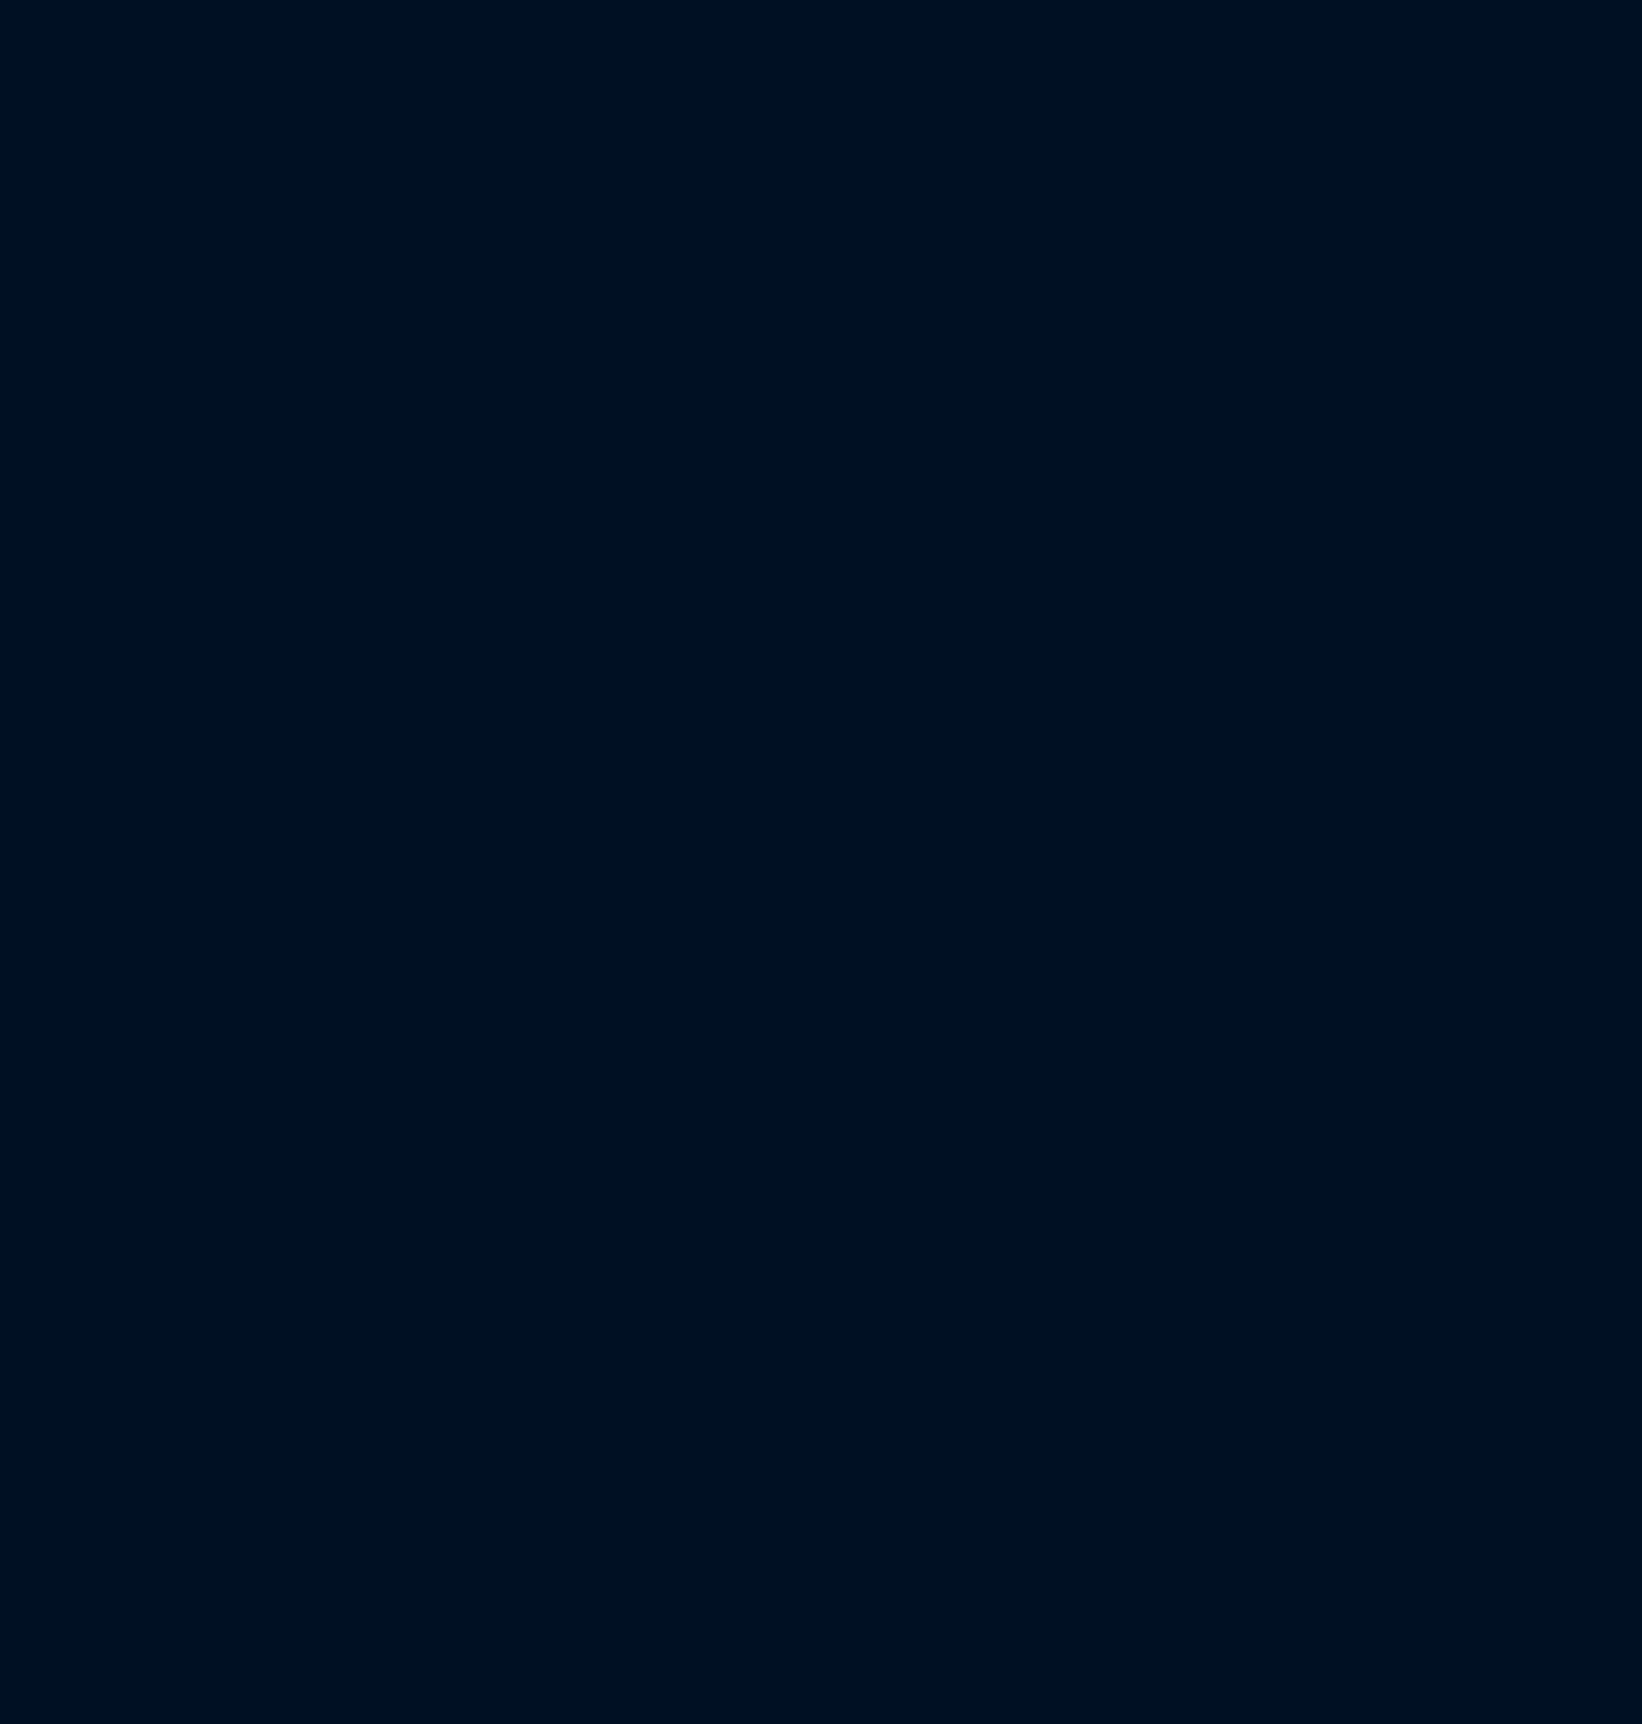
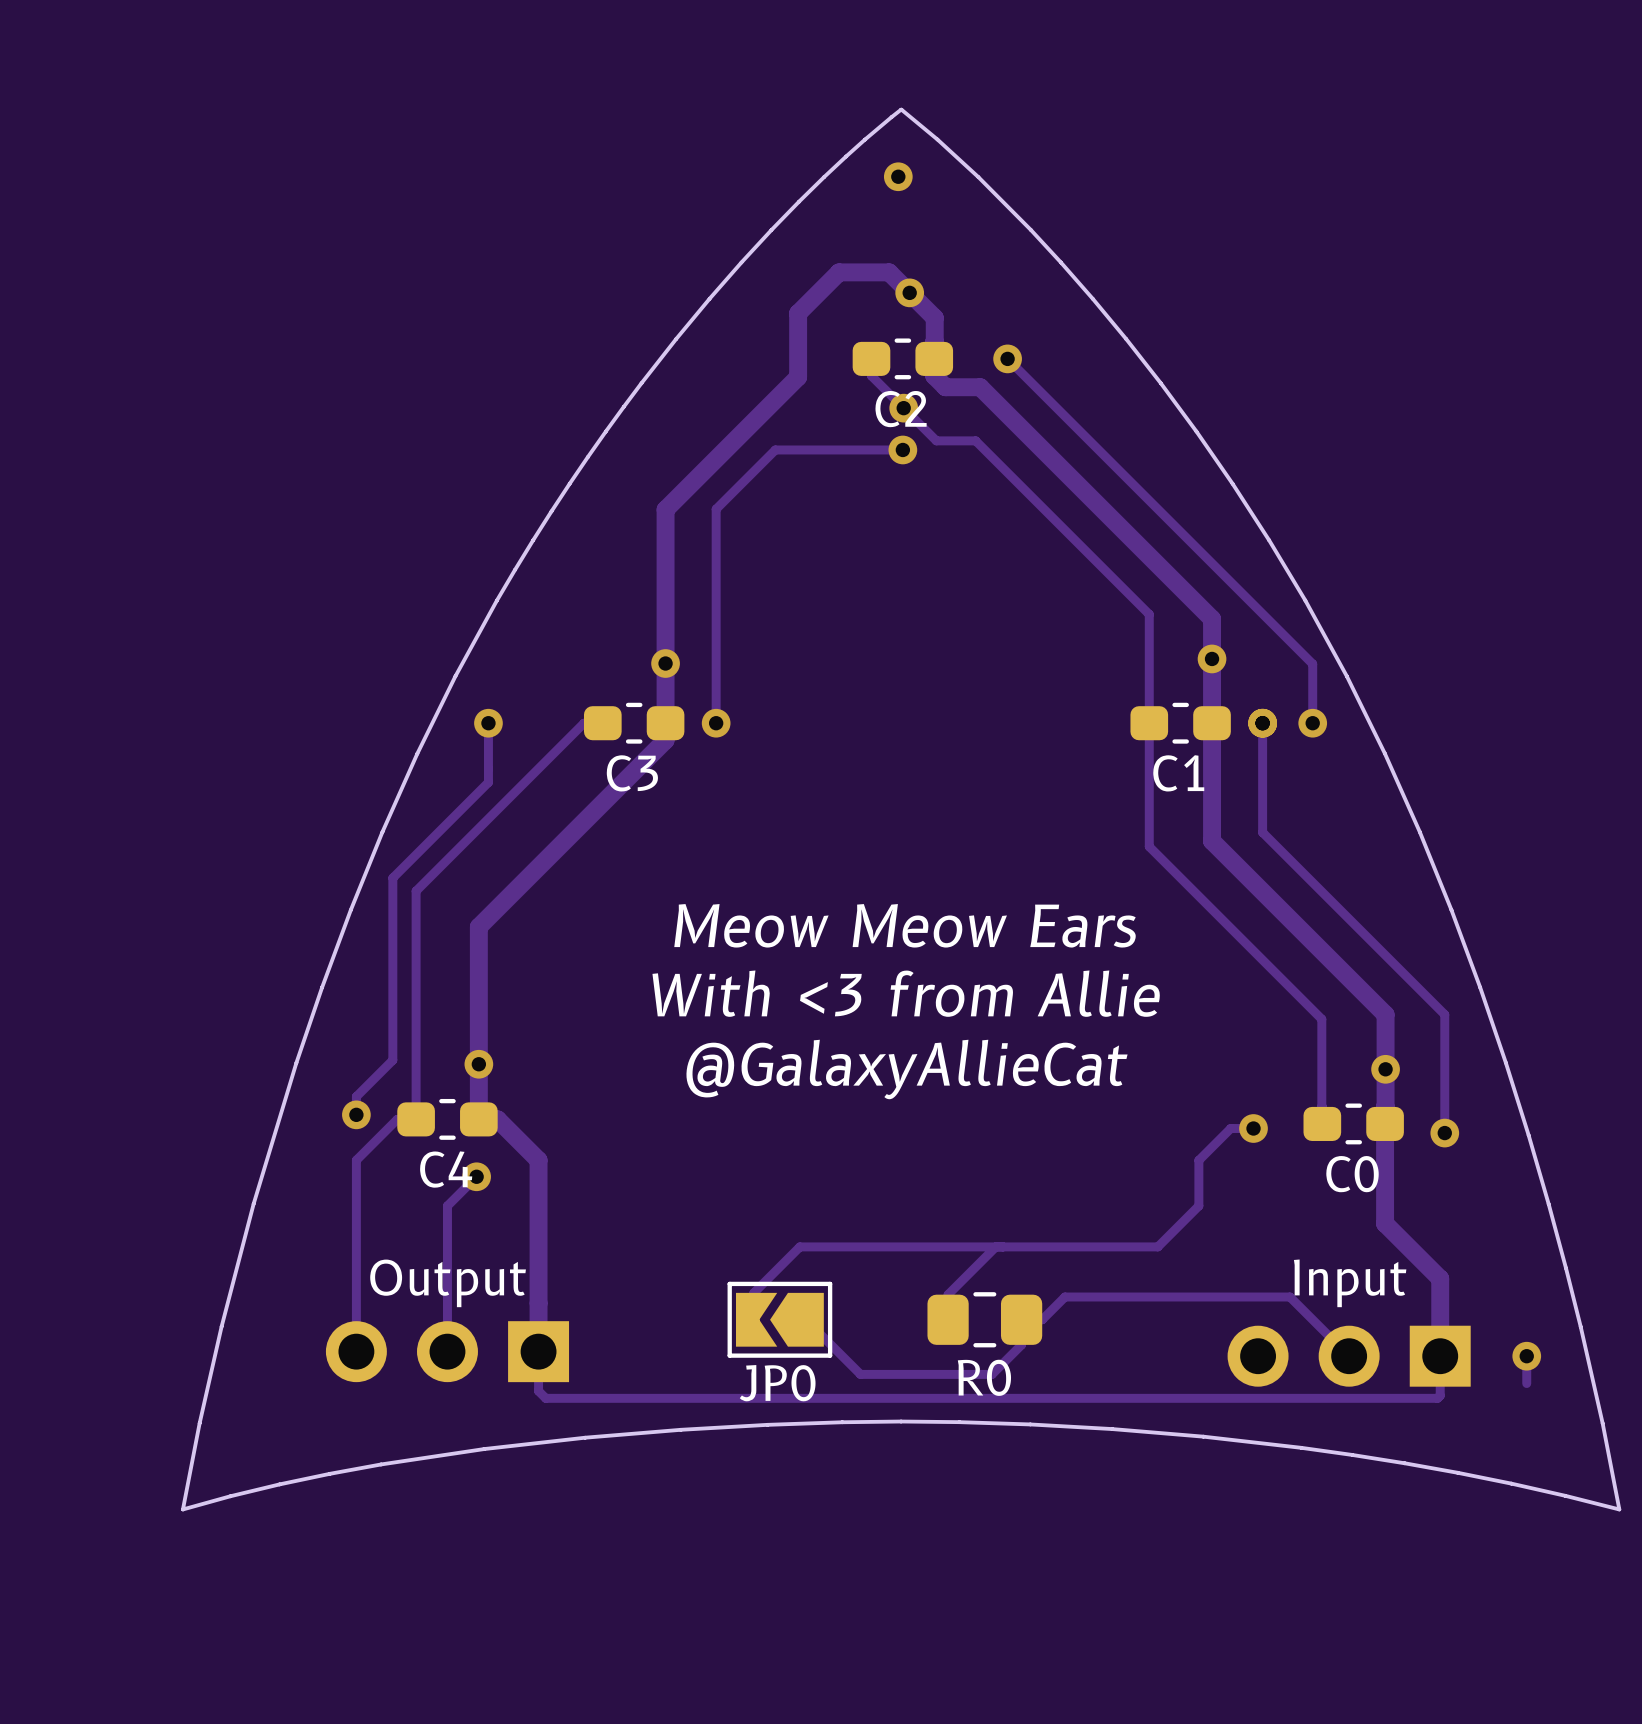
board edge: none -> (901, 109) (978, 177) (1031, 230) (1126, 339) (1196, 431) (1232, 483) (1305, 600) (1346, 676) (1384, 753) (1419, 831) (1451, 910) (1505, 1062) (1528, 1135) (1565, 1268) (1602, 1423) (1619, 1509) (1457, 1472) (1301, 1447) (1112, 1429) (1030, 1424) (901, 1421) (767, 1424) (680, 1429) (484, 1449) (329, 1473) (230, 1496) (182, 1509) (221, 1326) (253, 1203) (296, 1062) (350, 910) (382, 831) (417, 753) (455, 676) (496, 600) (551, 511) (605, 431) (676, 339) (741, 262) (799, 201) (846, 156) (901, 109)
via: none -> (898, 176)
via: none -> (909, 292)
track: none -> (934, 341) (934, 317) (889, 272) (839, 272) (798, 313) (798, 377) (665, 509) (665, 740) (478, 926) (478, 1119) (497, 1119) (538, 1160) (538, 1391) (545, 1398) (1437, 1398) (1440, 1395) (1440, 1278) (1385, 1223) (1385, 1106)
track: none -> (934, 341) (934, 375) (945, 387) (980, 387) (1212, 618) (1212, 841) (1385, 1014) (1385, 1106)
track: none -> (871, 358) (871, 375) (936, 440) (975, 440) (1149, 614) (1149, 846) (1321, 1019) (1321, 1106)
C2: none -> (902, 358)
track: none -> (1007, 358) (1312, 664) (1312, 723)
via: none -> (1007, 358)
via: none -> (903, 408)
track: none -> (902, 449) (775, 449) (716, 509) (716, 723)
via: none -> (902, 449)
via: none -> (1212, 658)
via: none -> (665, 663)
track: none -> (488, 723) (488, 782) (392, 878) (392, 1060) (356, 1096) (356, 1114)
via: none -> (488, 723)
track: none -> (602, 723) (583, 723) (416, 891) (416, 1119) (397, 1119) (356, 1160) (356, 1351)
C3: none -> (634, 723)
via: none -> (716, 723)
C1: none -> (1180, 723)
track: none -> (1262, 723) (1262, 832) (1444, 1014) (1444, 1133)
via: none -> (1262, 723)
via: none -> (1312, 723)
text: none -> Meow Meow Ears (905, 925)
text: none -> With <3 from Allie (906, 993)
via: none -> (478, 1064)
via: none -> (1385, 1069)
text: none -> @GalaxyAllieCat (906, 1069)
via: none -> (356, 1114)
C4: none -> (447, 1119)
C0: none -> (1353, 1123)
track: none -> (1253, 1128) (1230, 1128) (1198, 1160) (1198, 1205) (1157, 1246) (799, 1246) (753, 1292) (753, 1319)
via: none -> (1253, 1128)
via: none -> (1444, 1133)
track: none -> (476, 1176) (447, 1205) (447, 1351)
via: none -> (476, 1176)
track: none -> (995, 1246) (948, 1294) (948, 1319)
text: none -> Output (448, 1283)
text: none -> Input (1350, 1283)
JP0: none -> (779, 1319)
track: none -> (805, 1319) (860, 1374) (992, 1374) (1021, 1344) (1021, 1319) (1042, 1319) (1064, 1297) (1289, 1297) (1349, 1356)
R0: none -> (984, 1319)
part: none -> (447, 1351)
part: none -> (1349, 1356)
track: none -> (1526, 1356) (1526, 1383)
via: none -> (1526, 1356)

